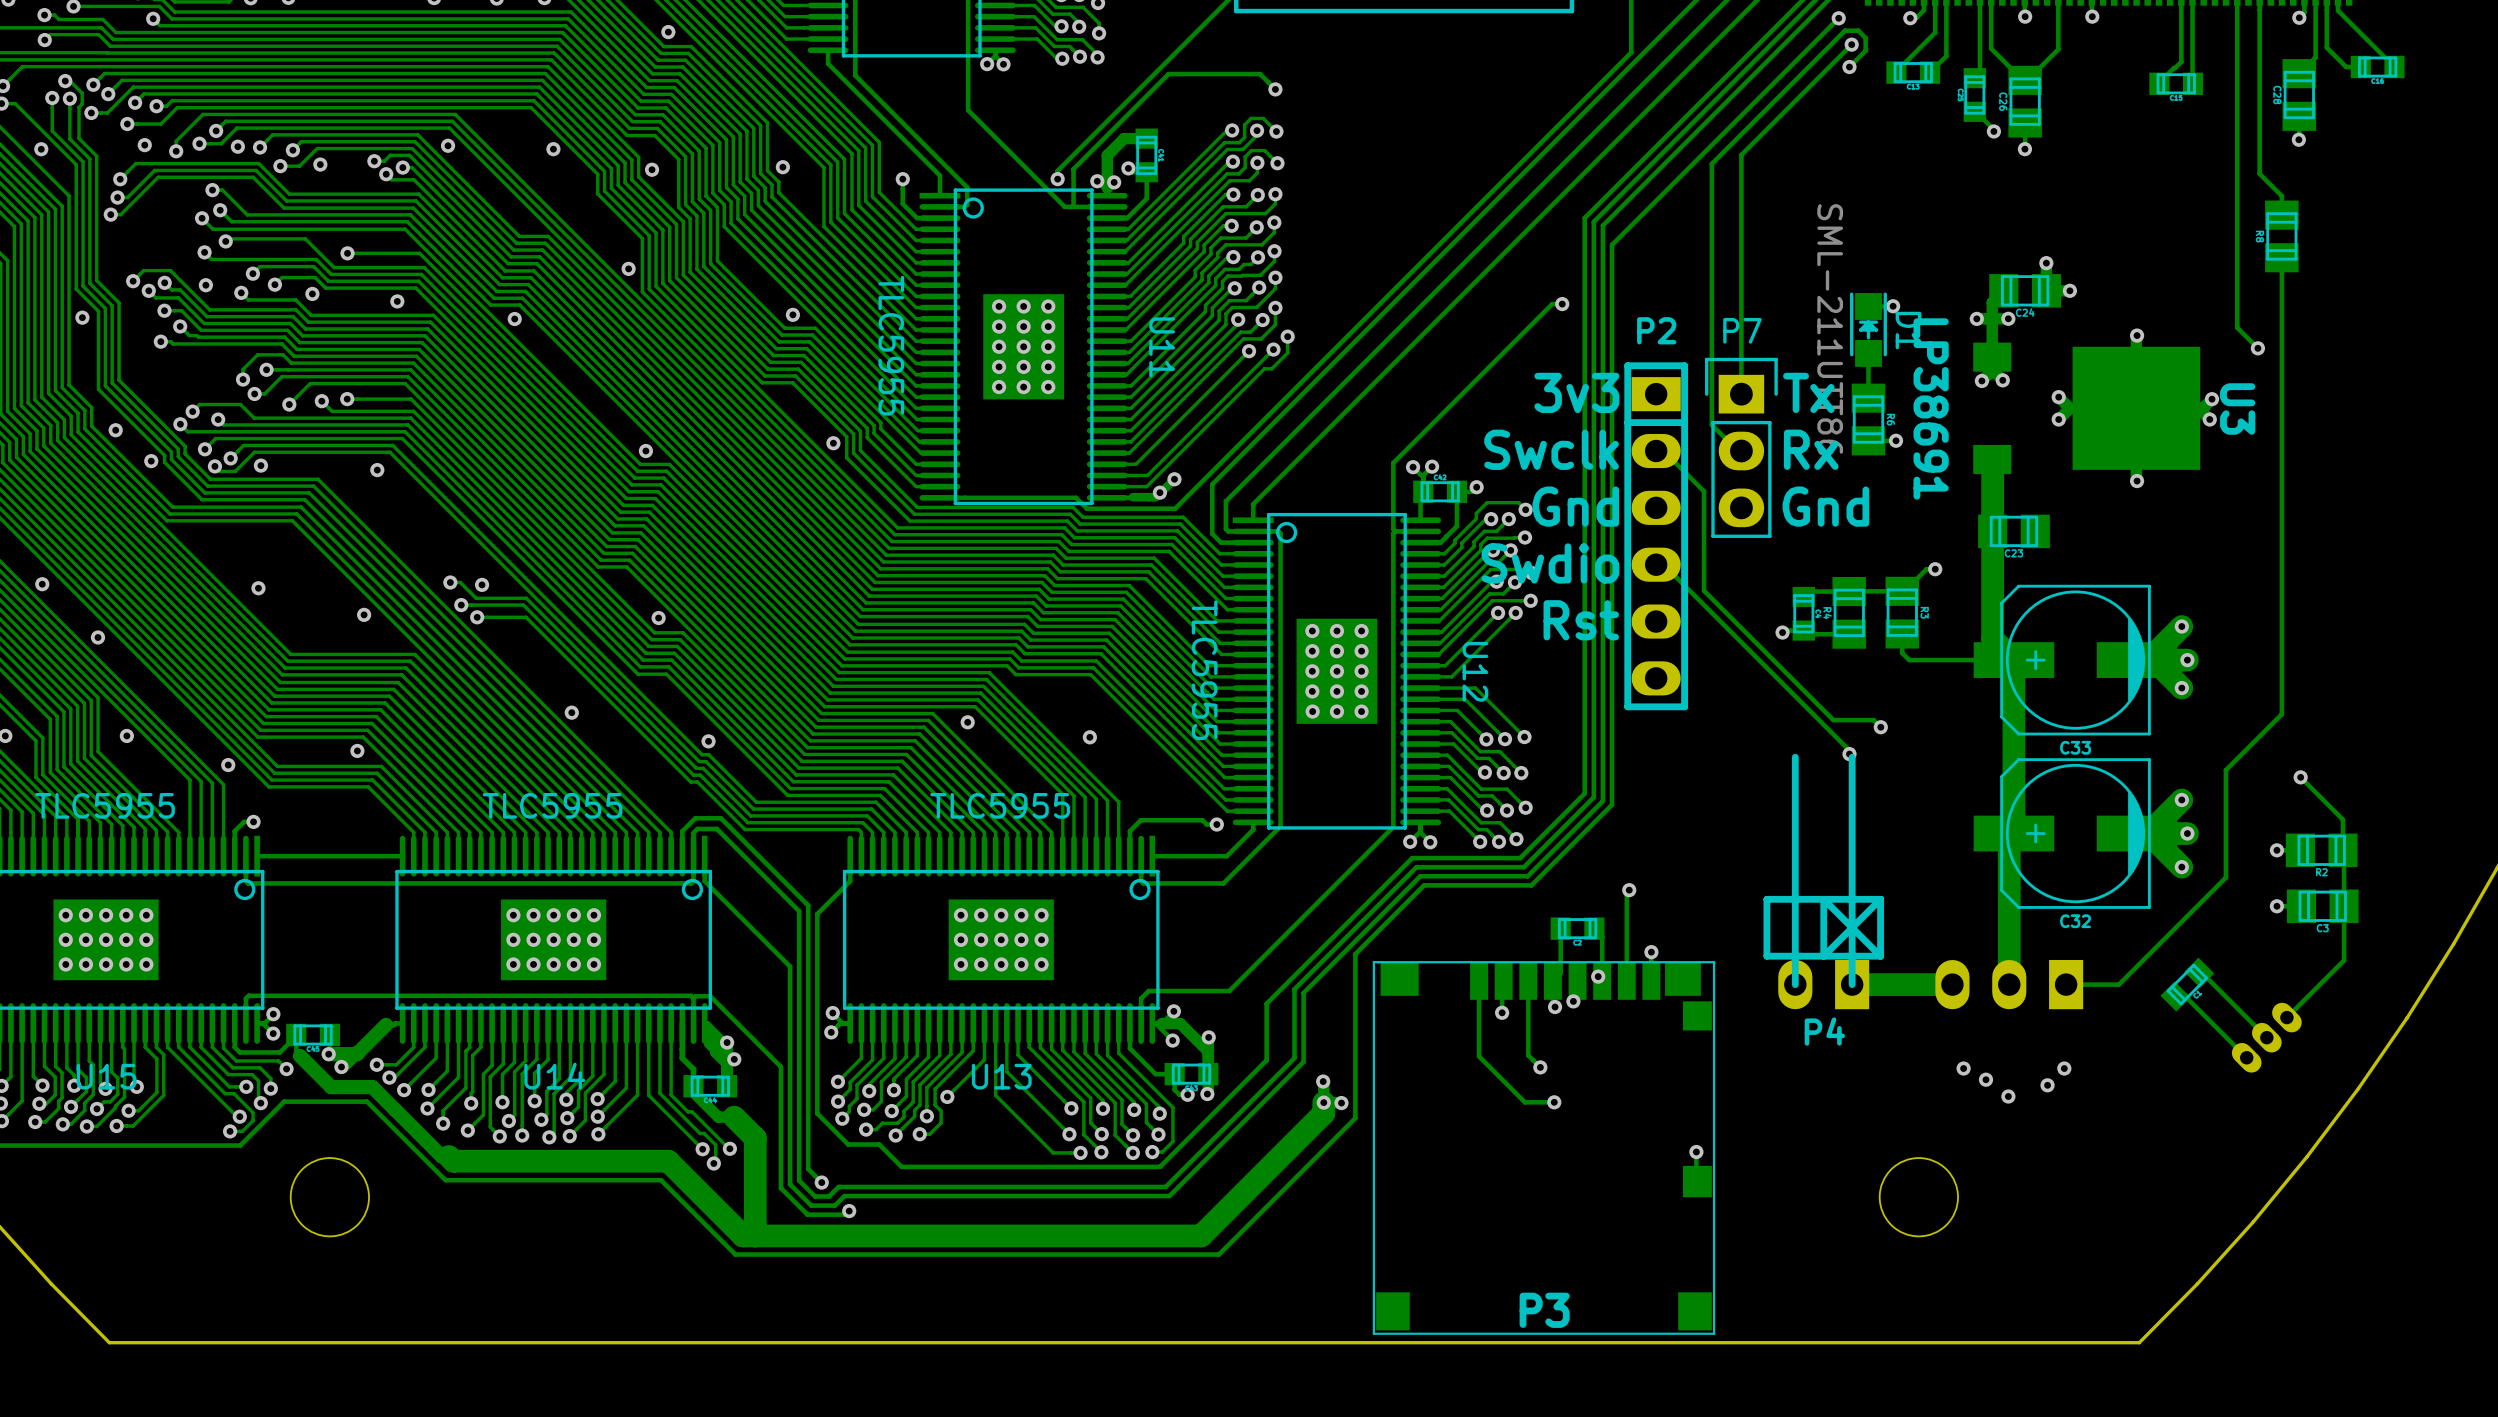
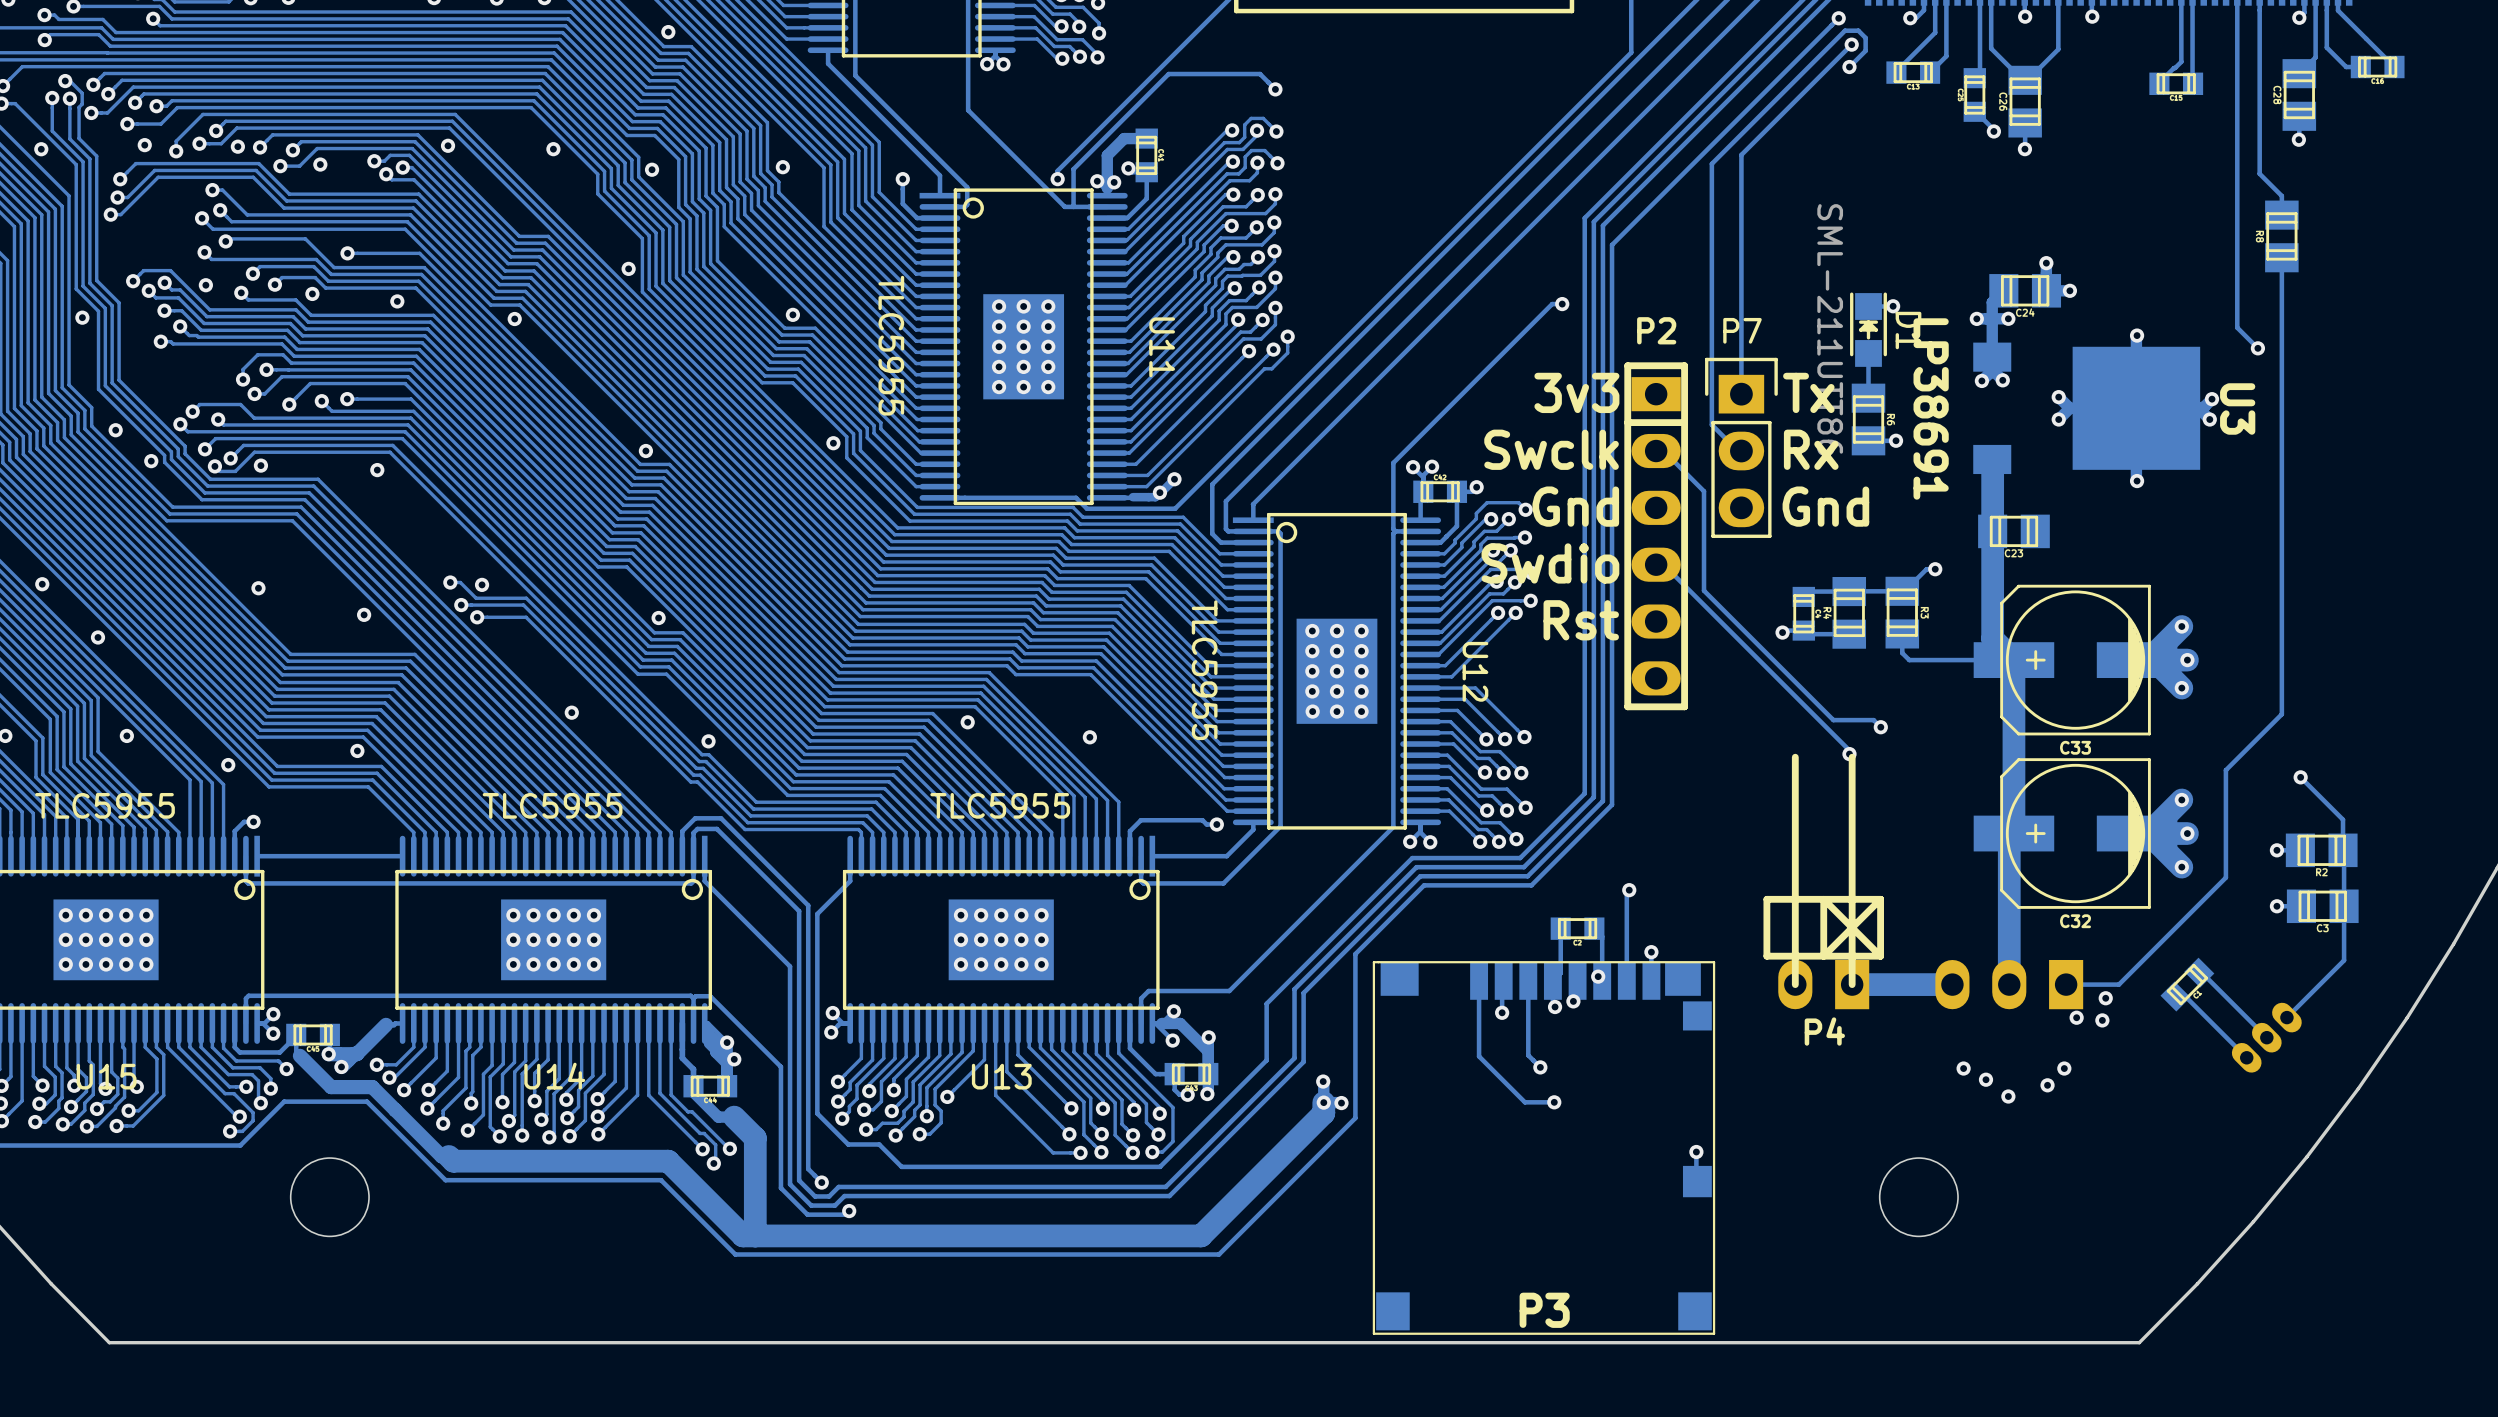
via: none -> (2105, 998)
via: none -> (2076, 1017)
via: none -> (2102, 1020)

